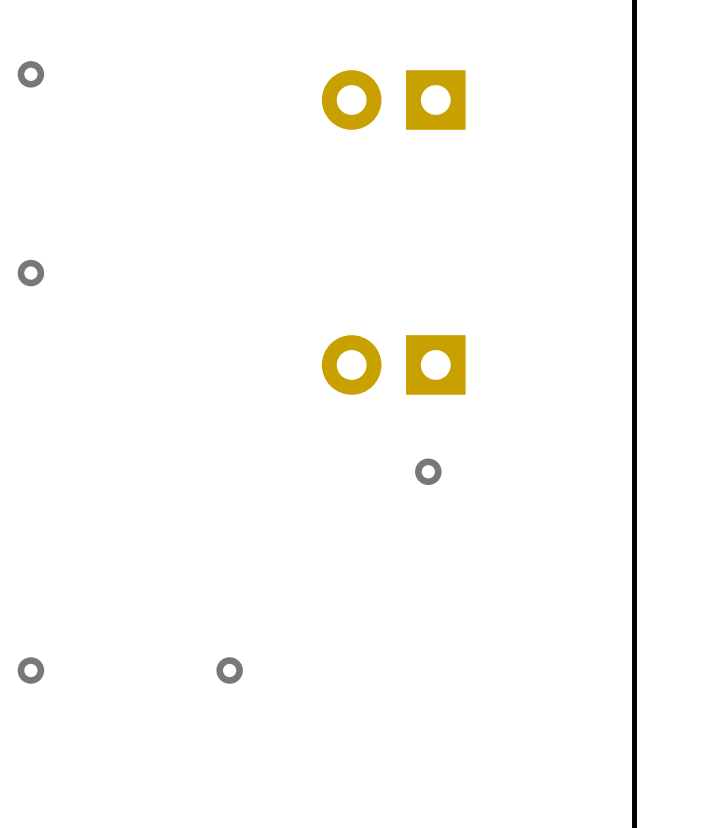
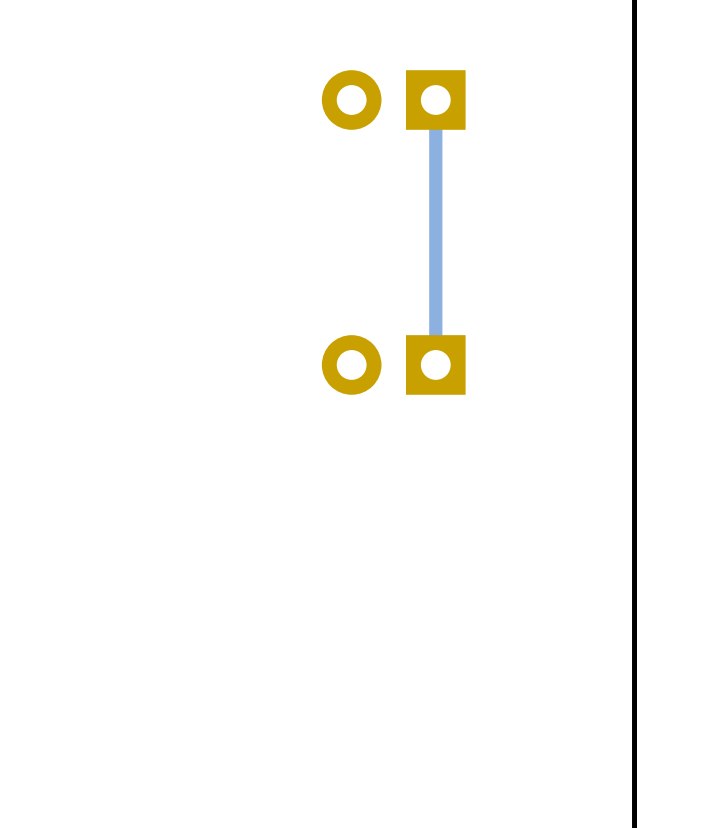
via: (30, 74) -> none
track: none -> (435, 100) (435, 364)
via: (30, 273) -> none
via: (428, 471) -> none
via: (30, 670) -> none
via: (229, 670) -> none

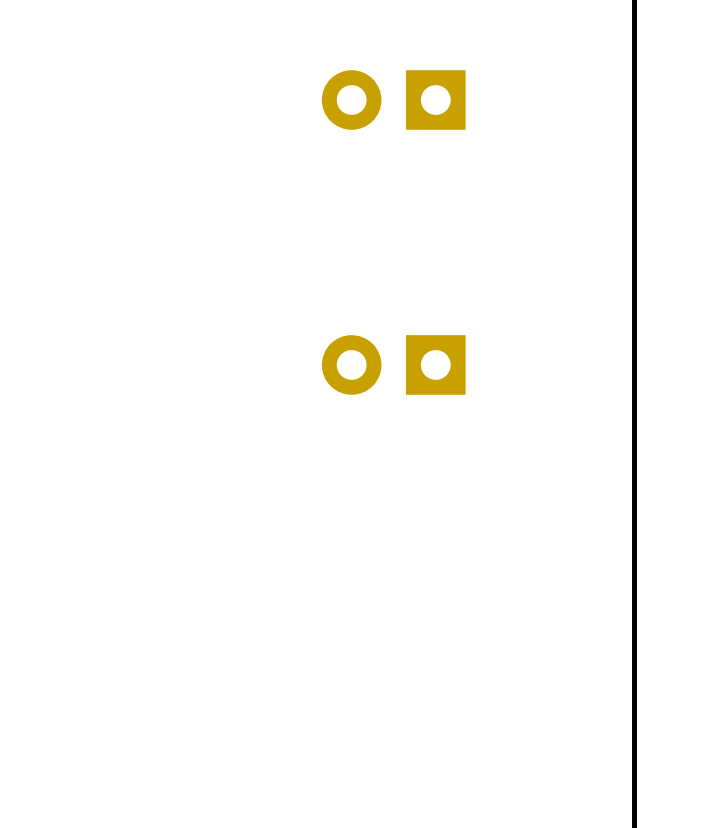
track: (435, 100) (435, 364) -> none

